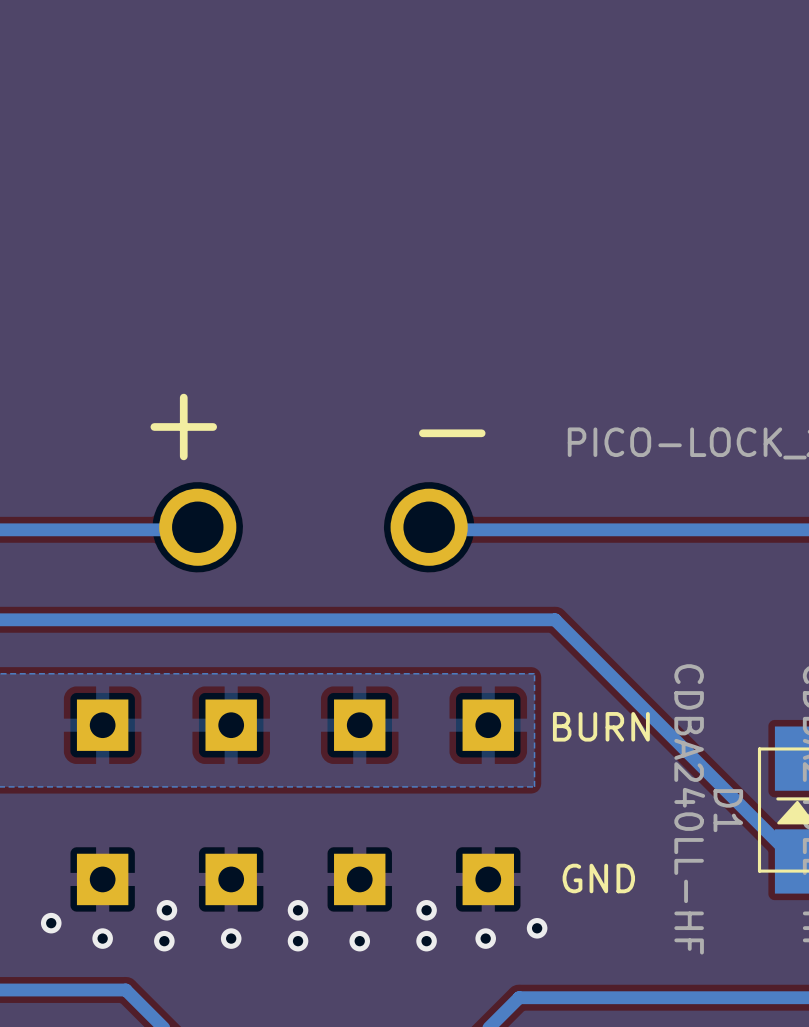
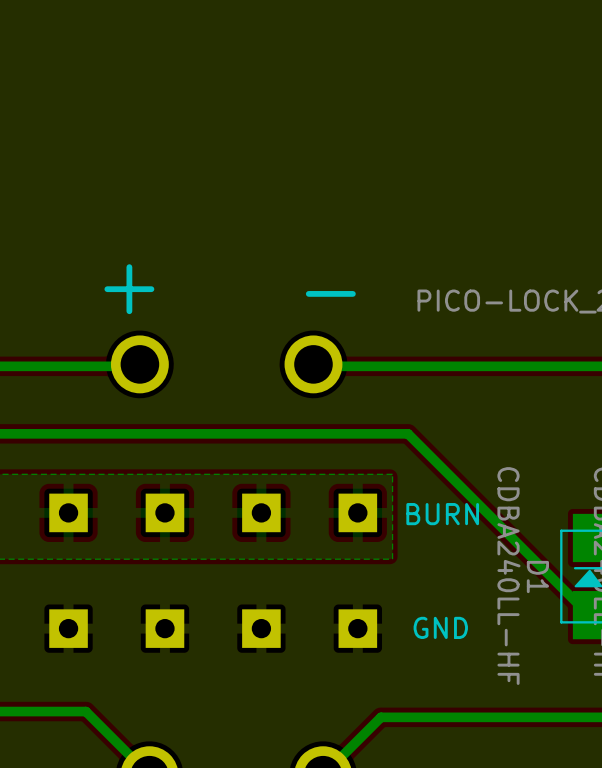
via: (166, 910) -> none
via: (298, 910) -> none
via: (426, 910) -> none
via: (51, 923) -> none
via: (537, 928) -> none
via: (102, 938) -> none
via: (231, 938) -> none
via: (485, 938) -> none
via: (164, 941) -> none
via: (298, 941) -> none
via: (359, 941) -> none
via: (426, 941) -> none

